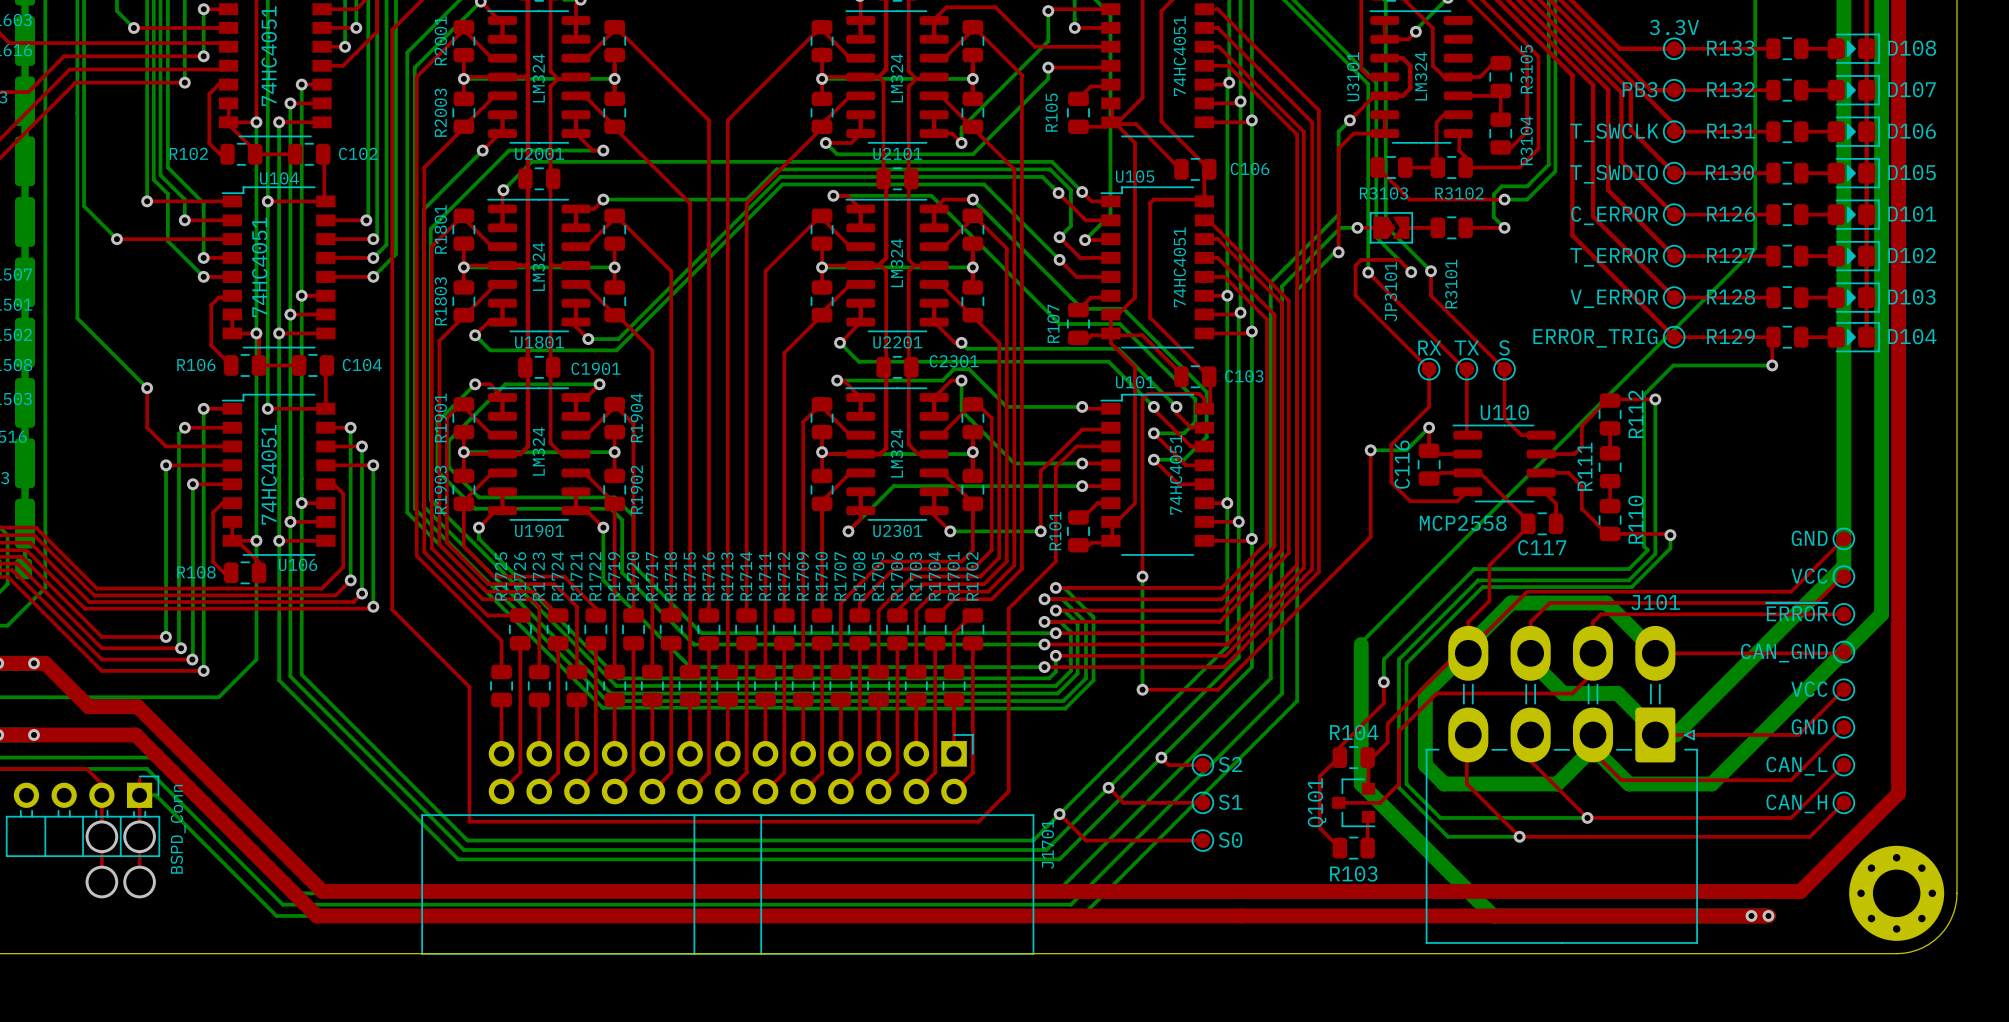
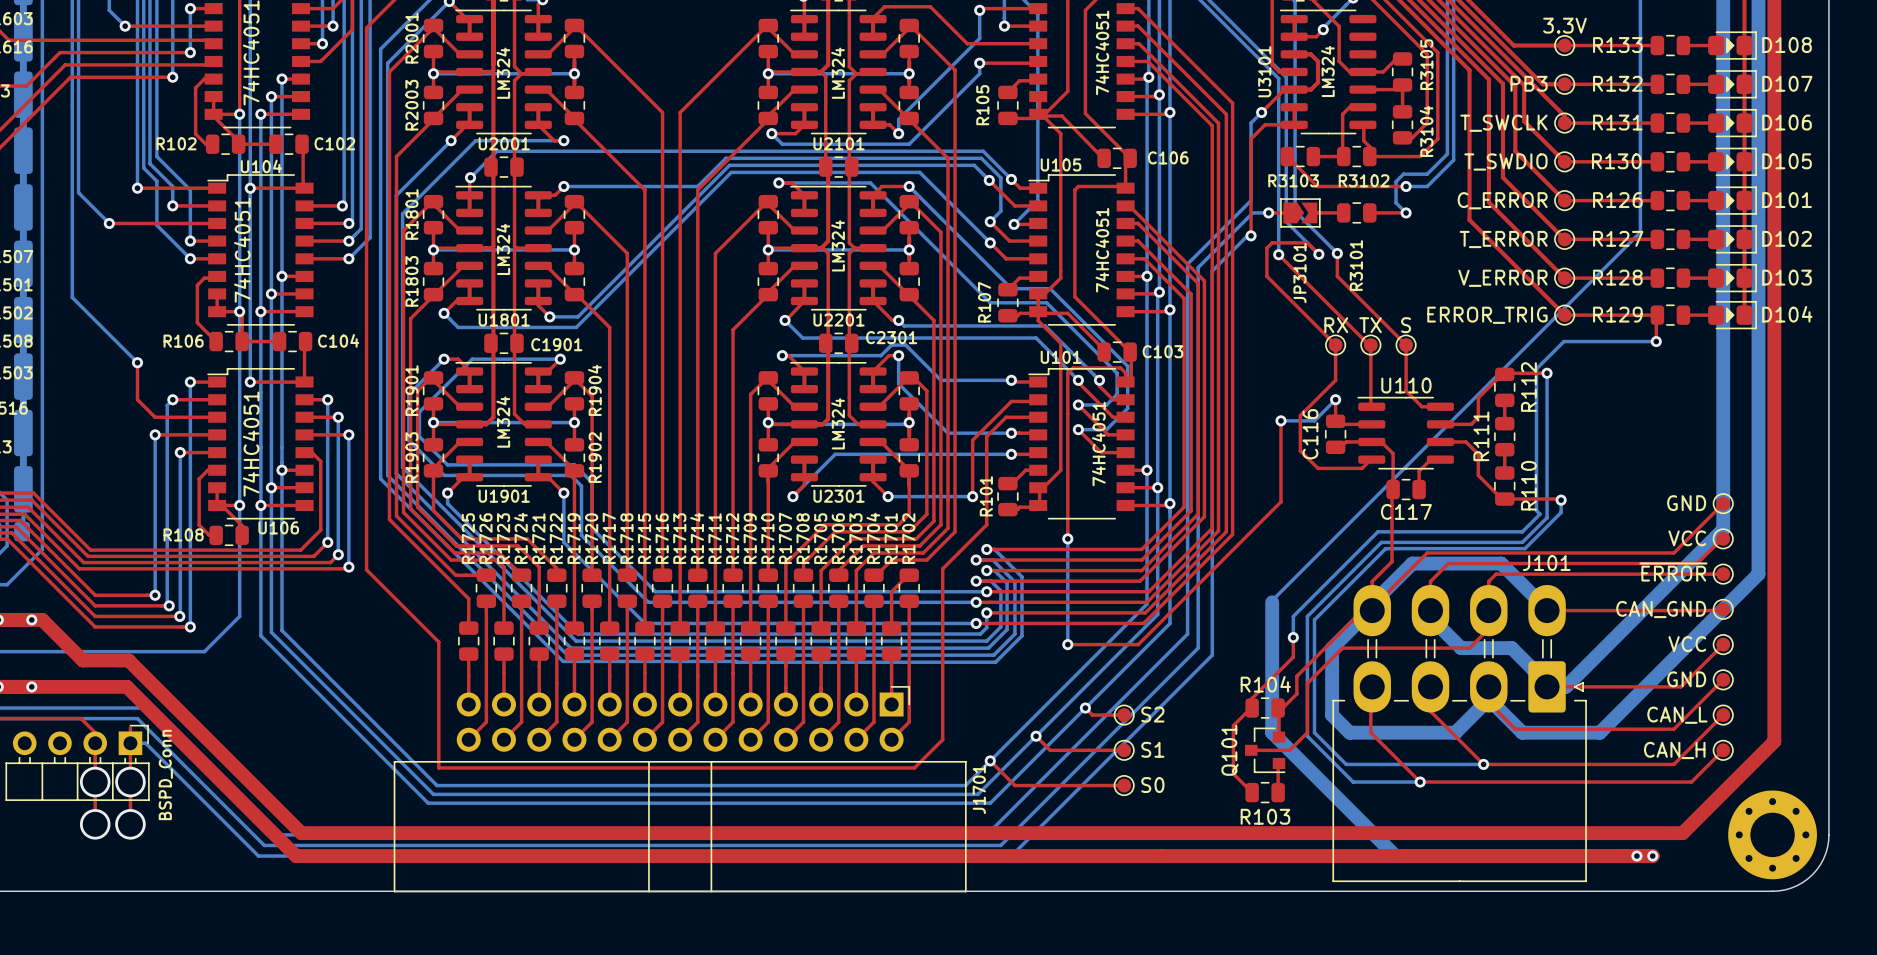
top track: (1478, 472) (1528, 521) (1528, 523) -> (1381, 441) (1393, 453) (1393, 489)
top track: (1542, 489) (1556, 503) (1556, 523) -> none
top track: none -> (1443, 459) (1430, 459) (1419, 471) (1419, 489)
U110 value: MCP2558 (1463, 523) -> none
top track: (1530, 523) (1489, 565) -> (1392, 489) (1392, 528)
C117 position: (1542, 523) -> (1406, 489)

